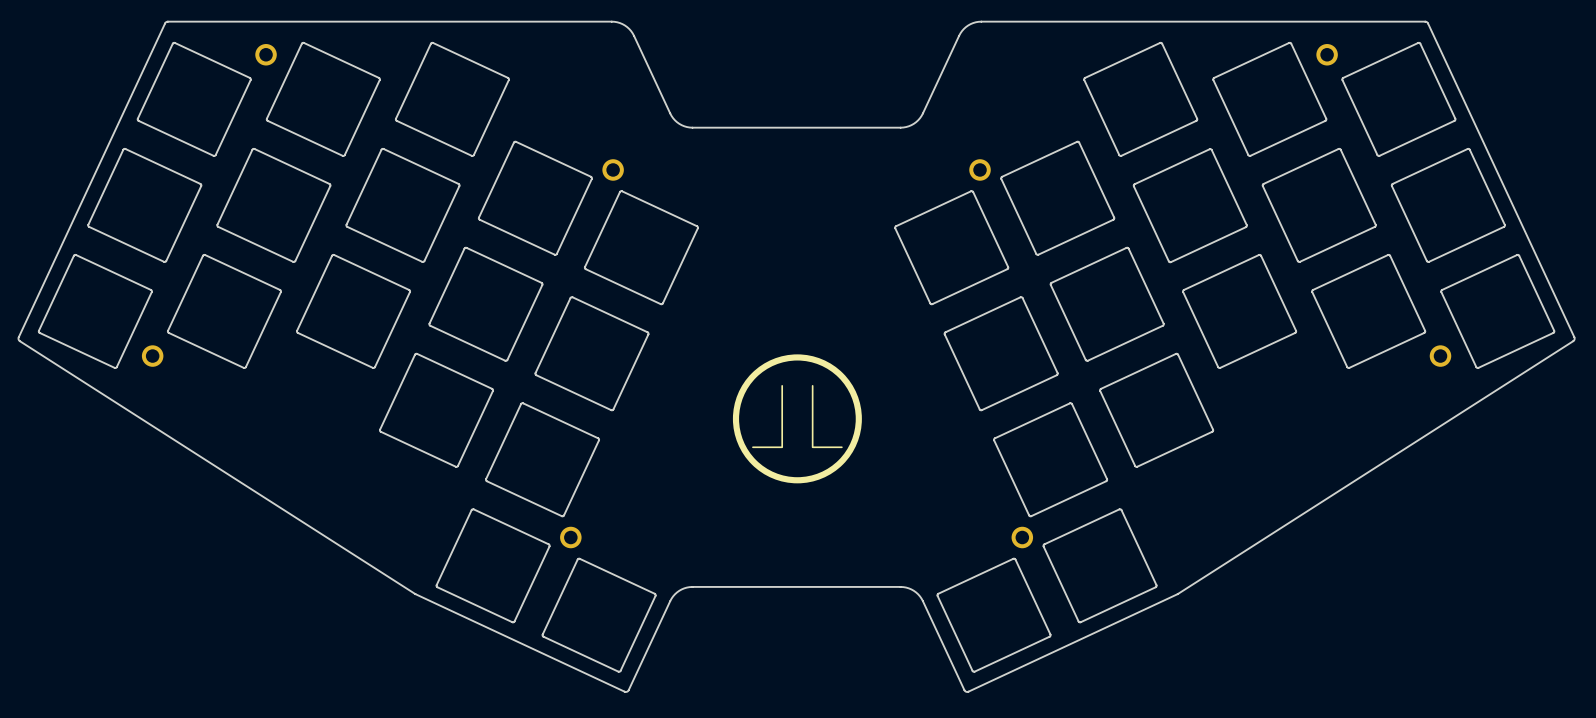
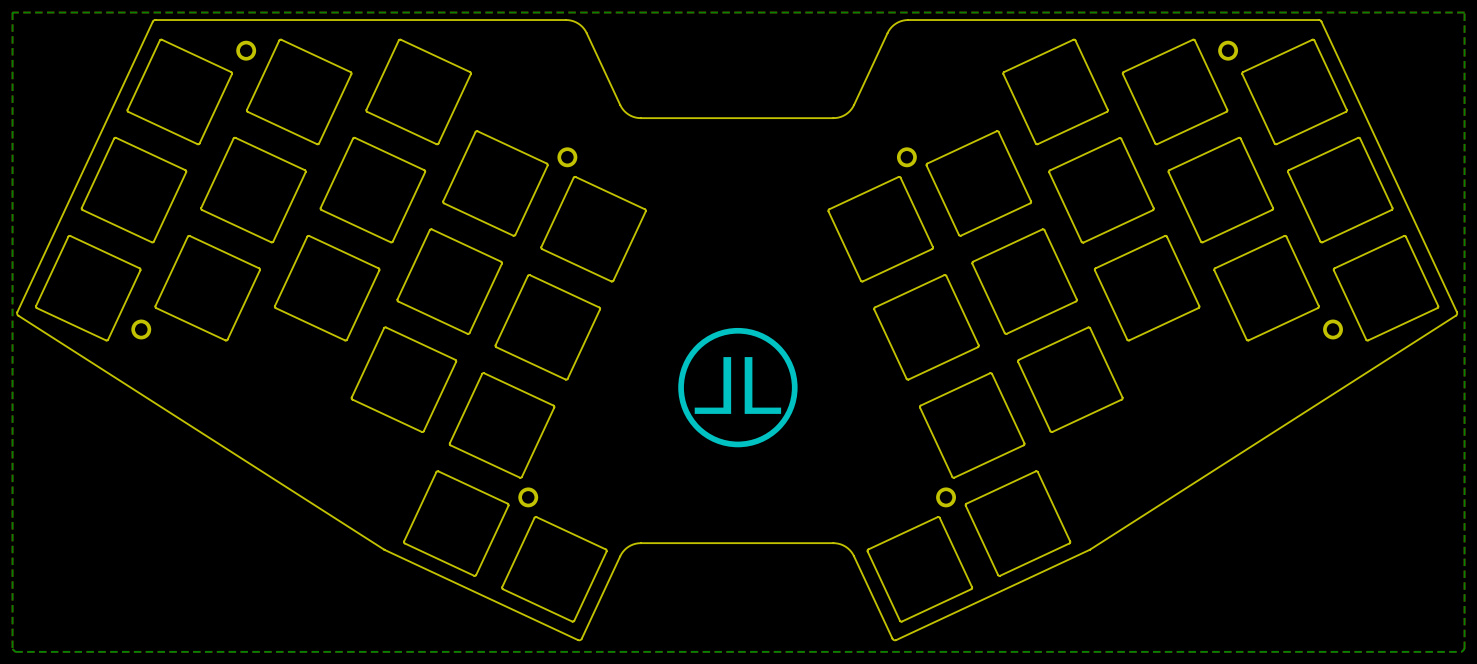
bottom zone outline: none -> (1464, 12) (12, 12) (12, 649) (15, 651) (1461, 651) (1464, 649) (1464, 12)

